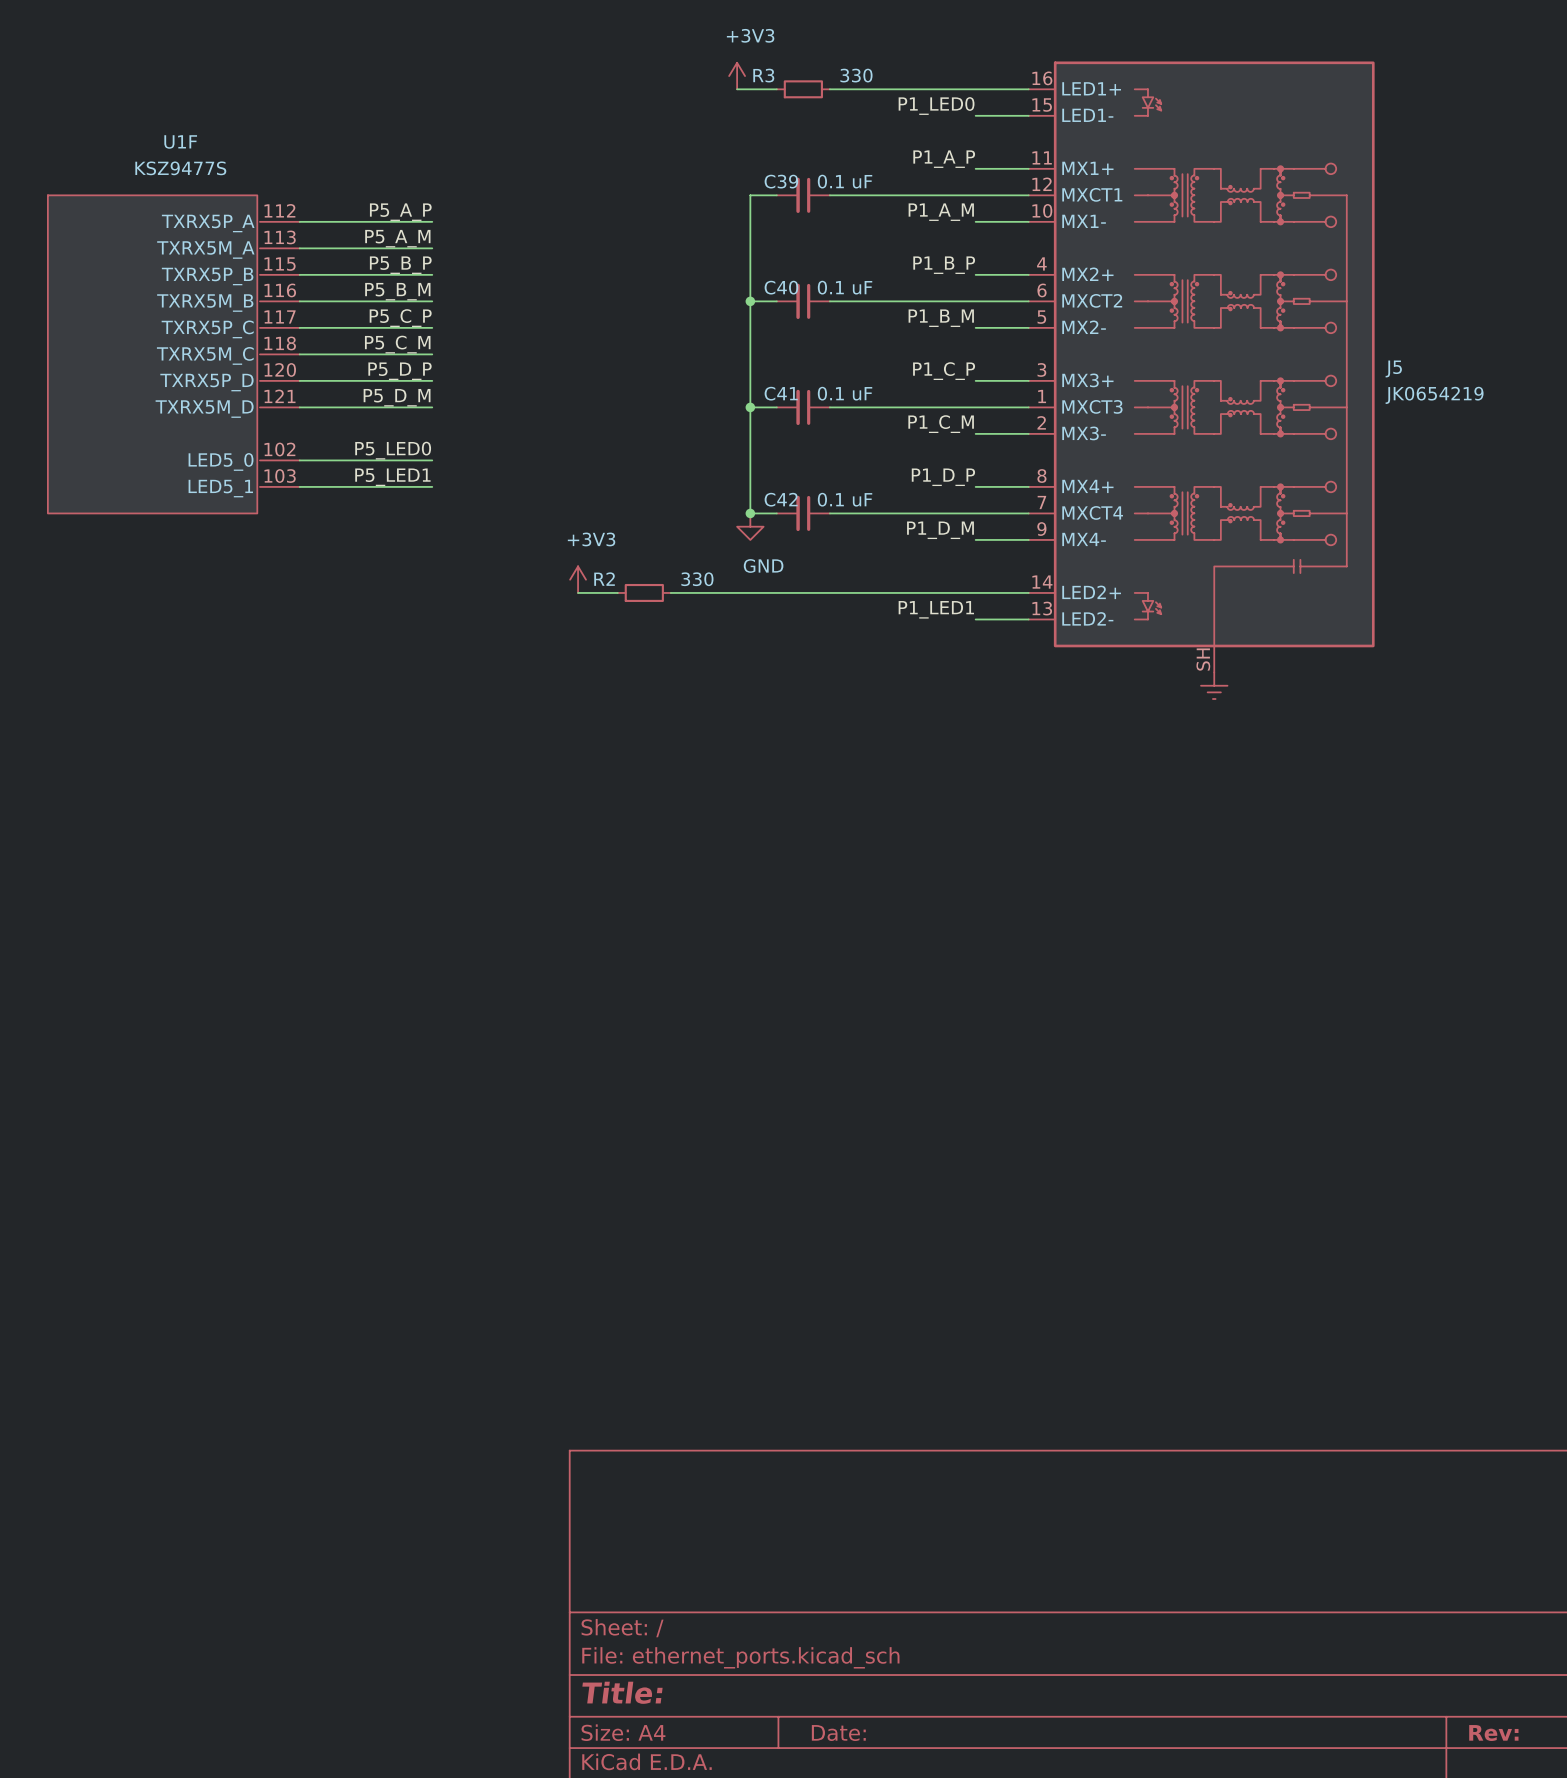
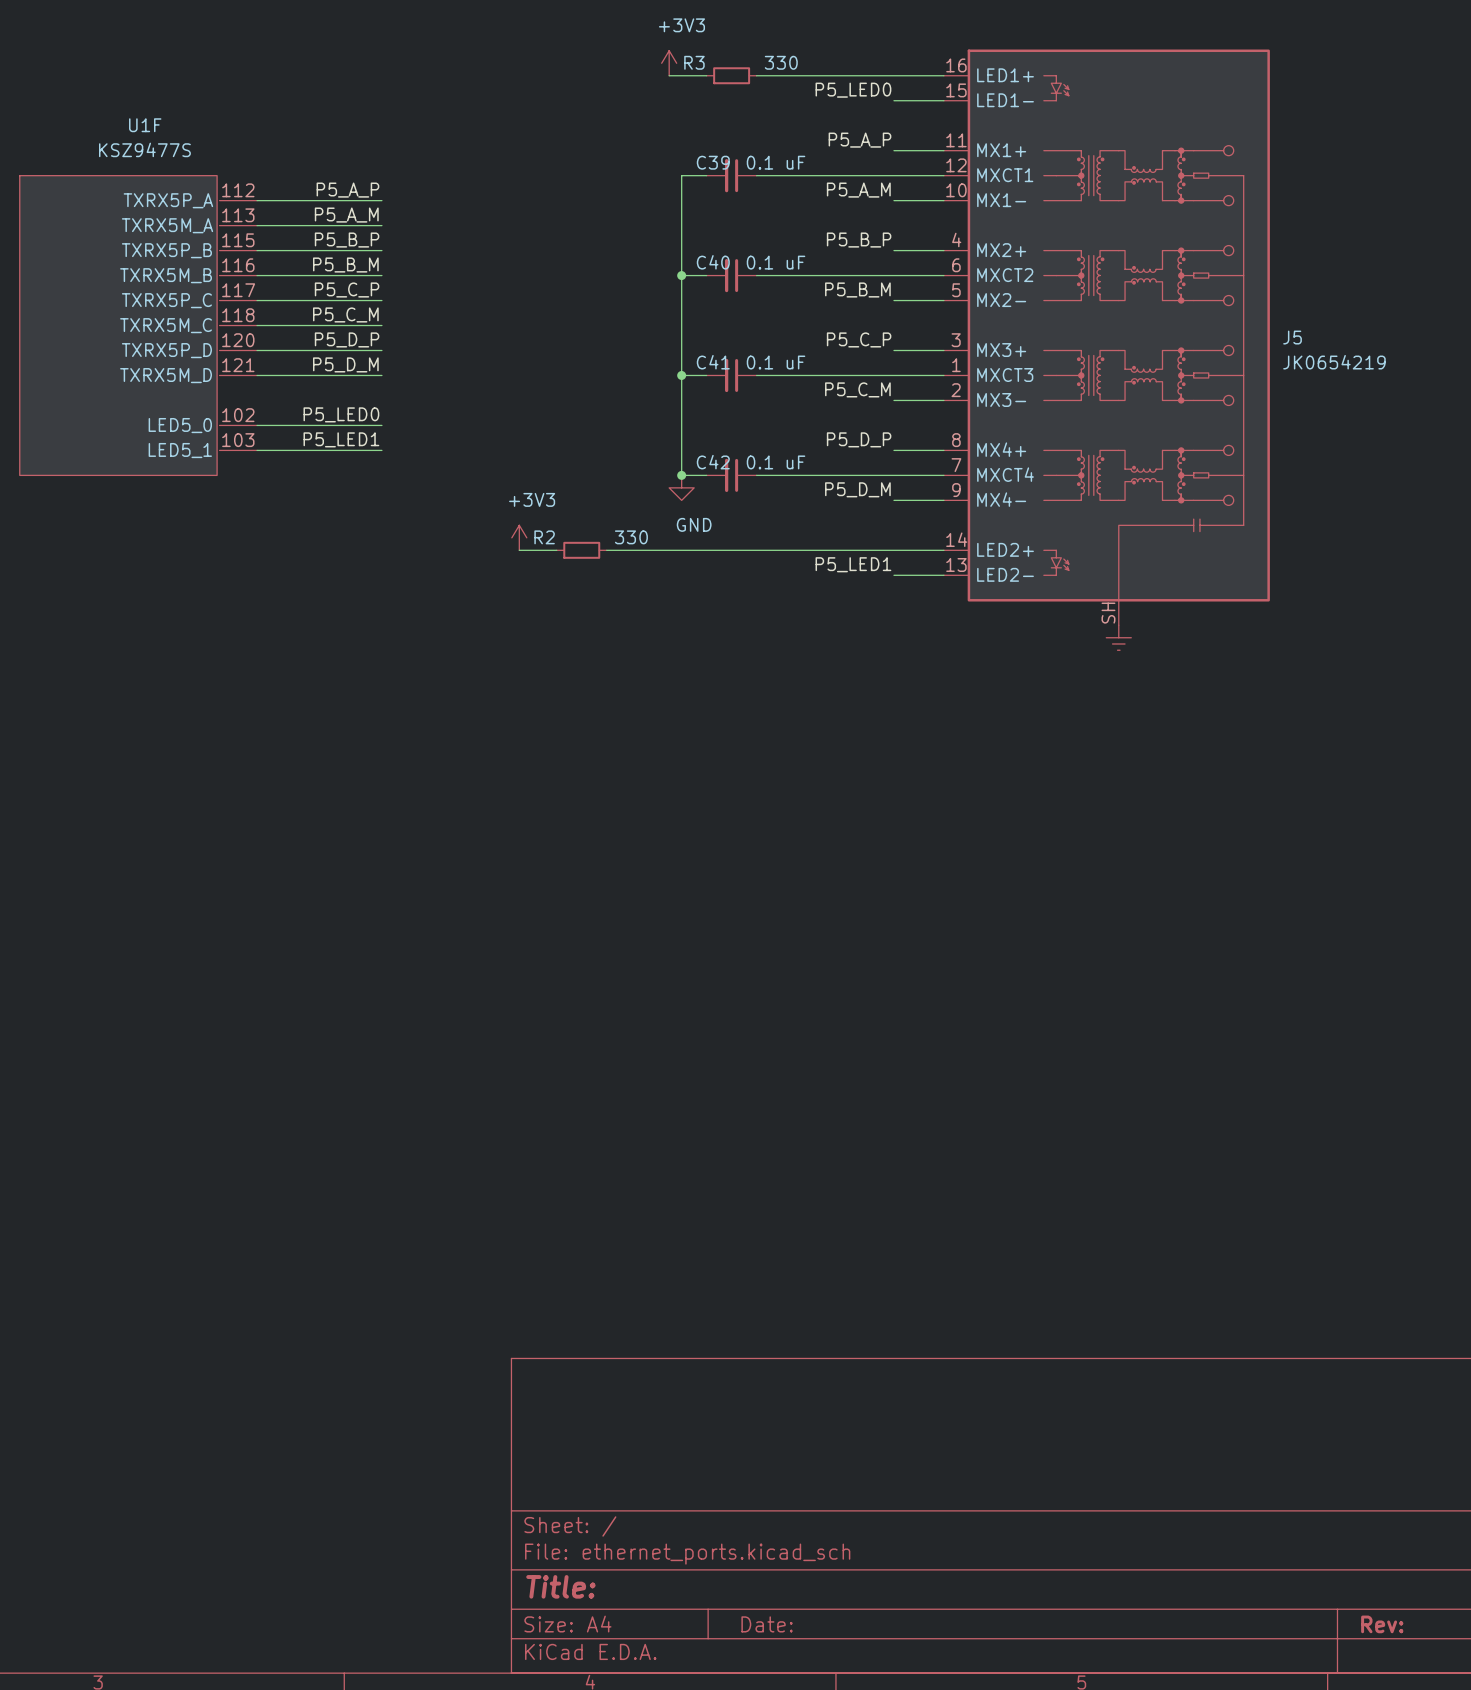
label: P1_LED0 (936, 106) -> P5_LED0 (853, 90)
label: P1_A_P (944, 159) -> P5_A_P (859, 140)
label: P1_A_M (941, 212) -> P5_A_M (858, 190)
label: P1_B_P (944, 265) -> P5_B_P (859, 240)
label: P1_B_M (941, 318) -> P5_B_M (857, 289)
label: P1_C_P (944, 371) -> P5_C_P (859, 339)
label: P1_C_M (941, 424) -> P5_C_M (857, 389)
label: P1_D_P (943, 477) -> P5_D_P (859, 439)
label: P1_D_M (940, 530) -> P5_D_M (857, 489)
label: P1_LED1 (936, 609) -> P5_LED1 (853, 564)

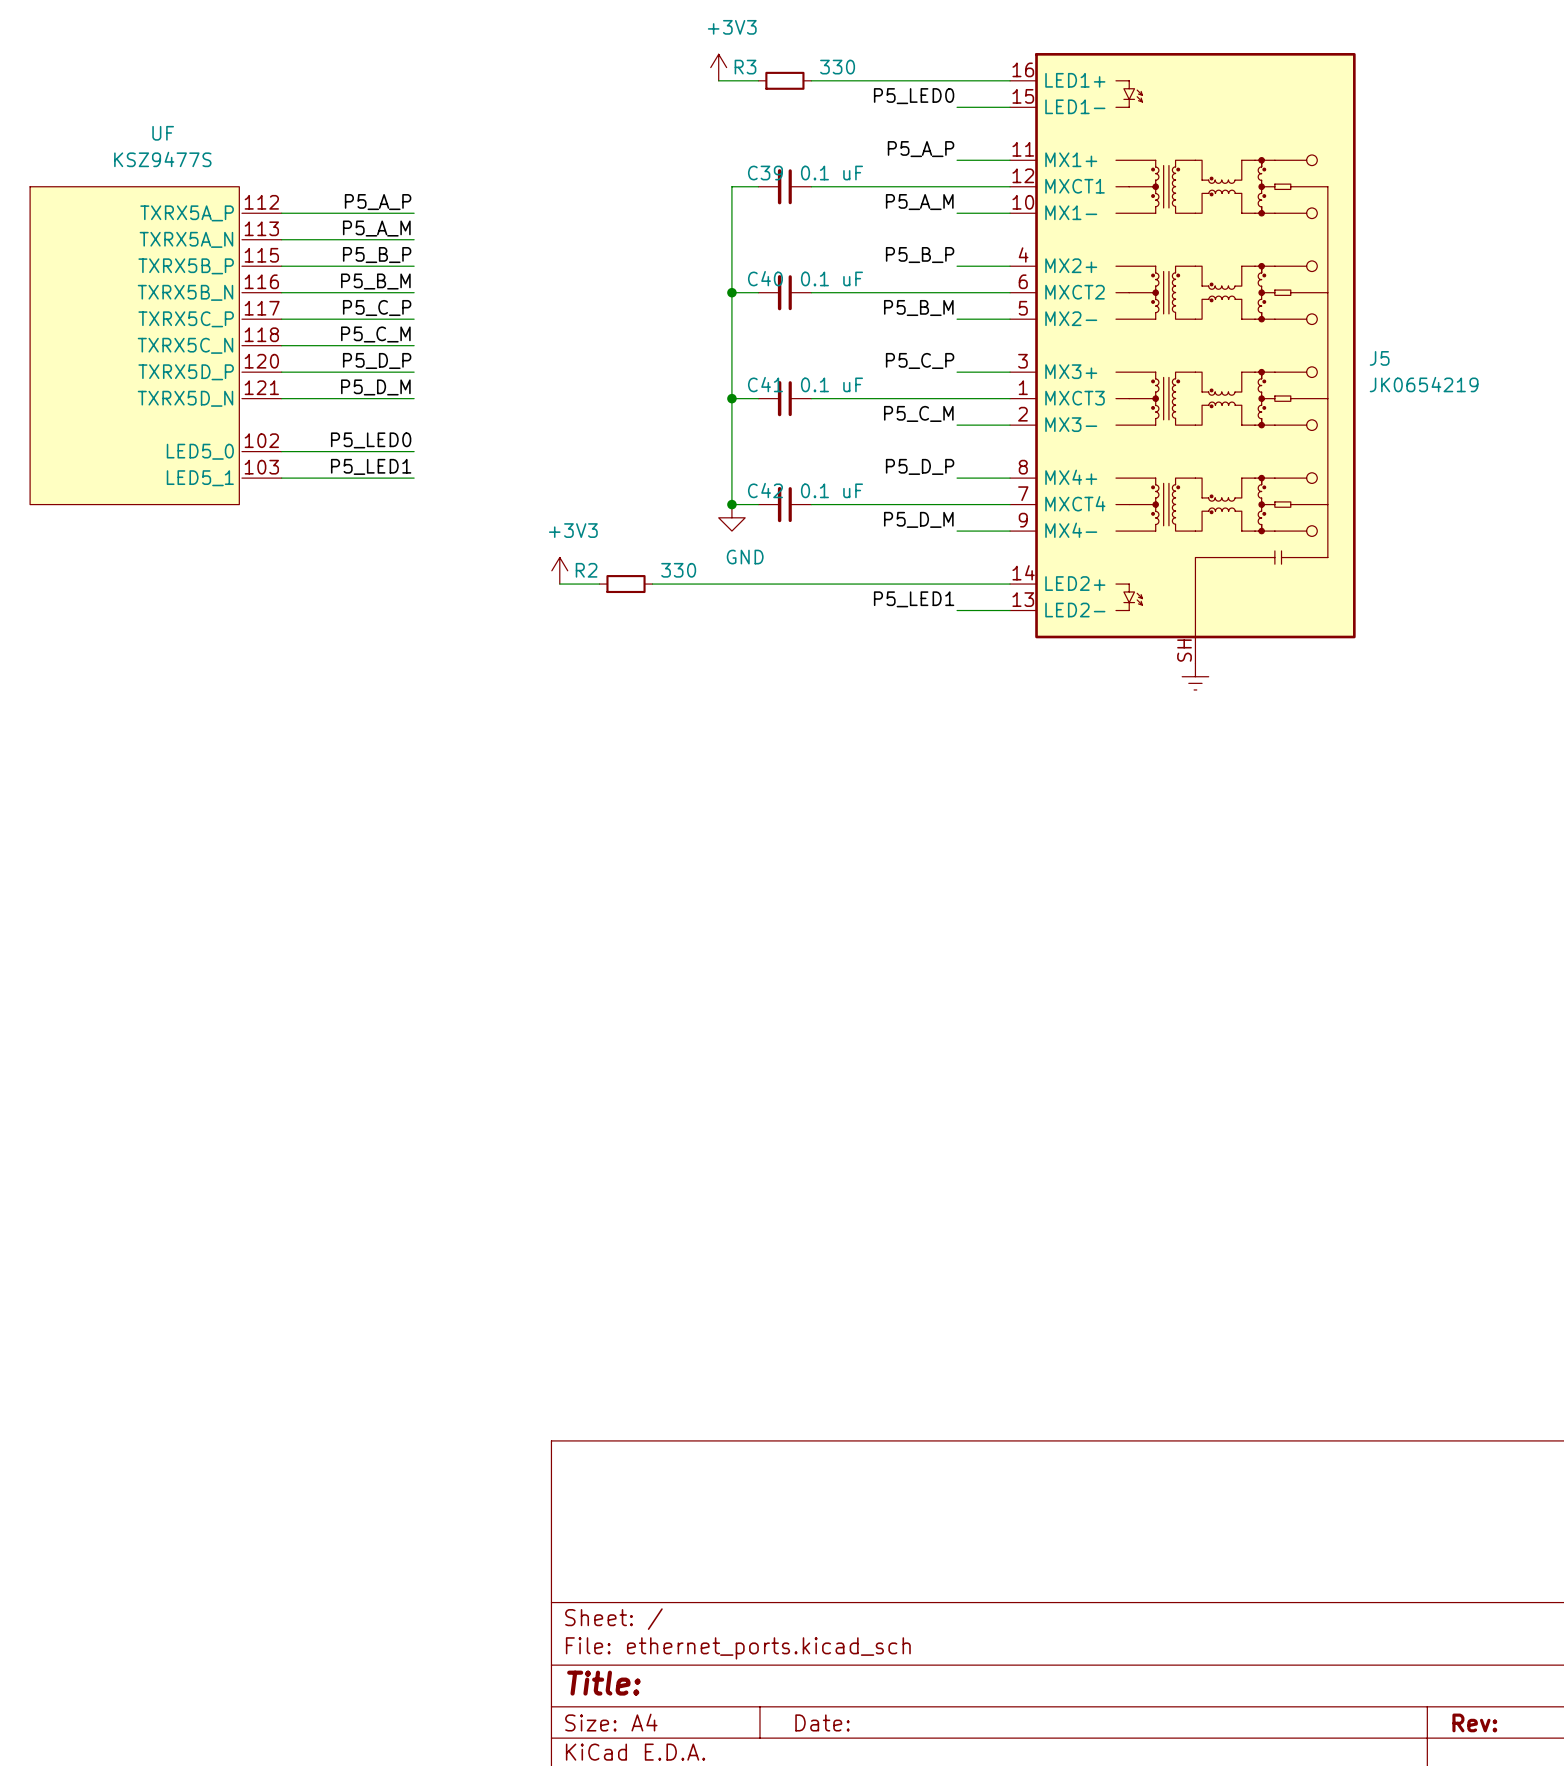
U1F name: U1F (145, 125) -> UF (163, 133)
U1F pin name: TXRX5P_A (168, 200) -> TXRX5A_P (187, 213)
U1F pin name: TXRX5M_A (167, 225) -> TXRX5A_N (186, 239)
U1F pin name: TXRX5P_B (166, 250) -> TXRX5B_P (186, 266)
U1F pin name: TXRX5M_B (166, 275) -> TXRX5B_N (185, 292)
U1F pin name: TXRX5P_C (166, 300) -> TXRX5C_P (186, 319)
U1F pin name: TXRX5M_C (166, 325) -> TXRX5C_N (185, 345)
U1F pin name: TXRX5P_D (166, 350) -> TXRX5D_P (186, 372)
U1F pin name: TXRX5M_D (166, 375) -> TXRX5D_N (185, 398)

